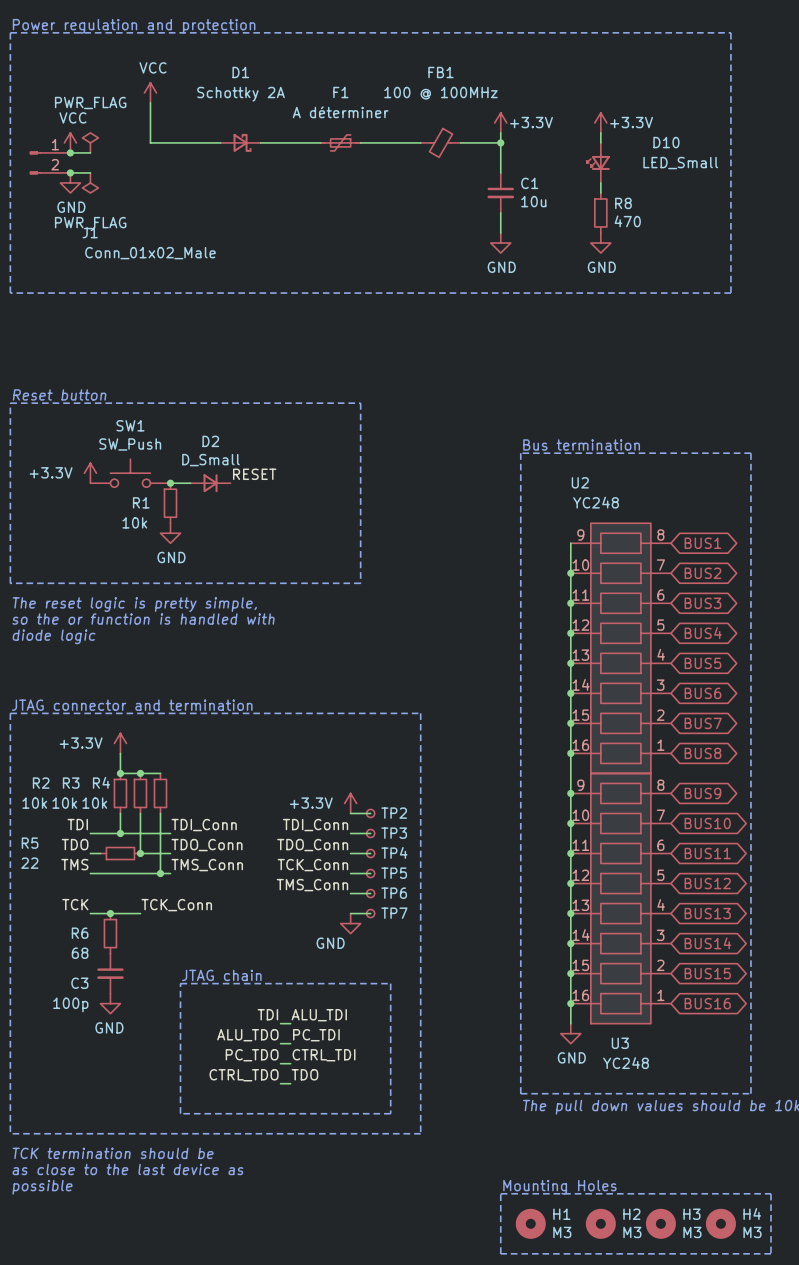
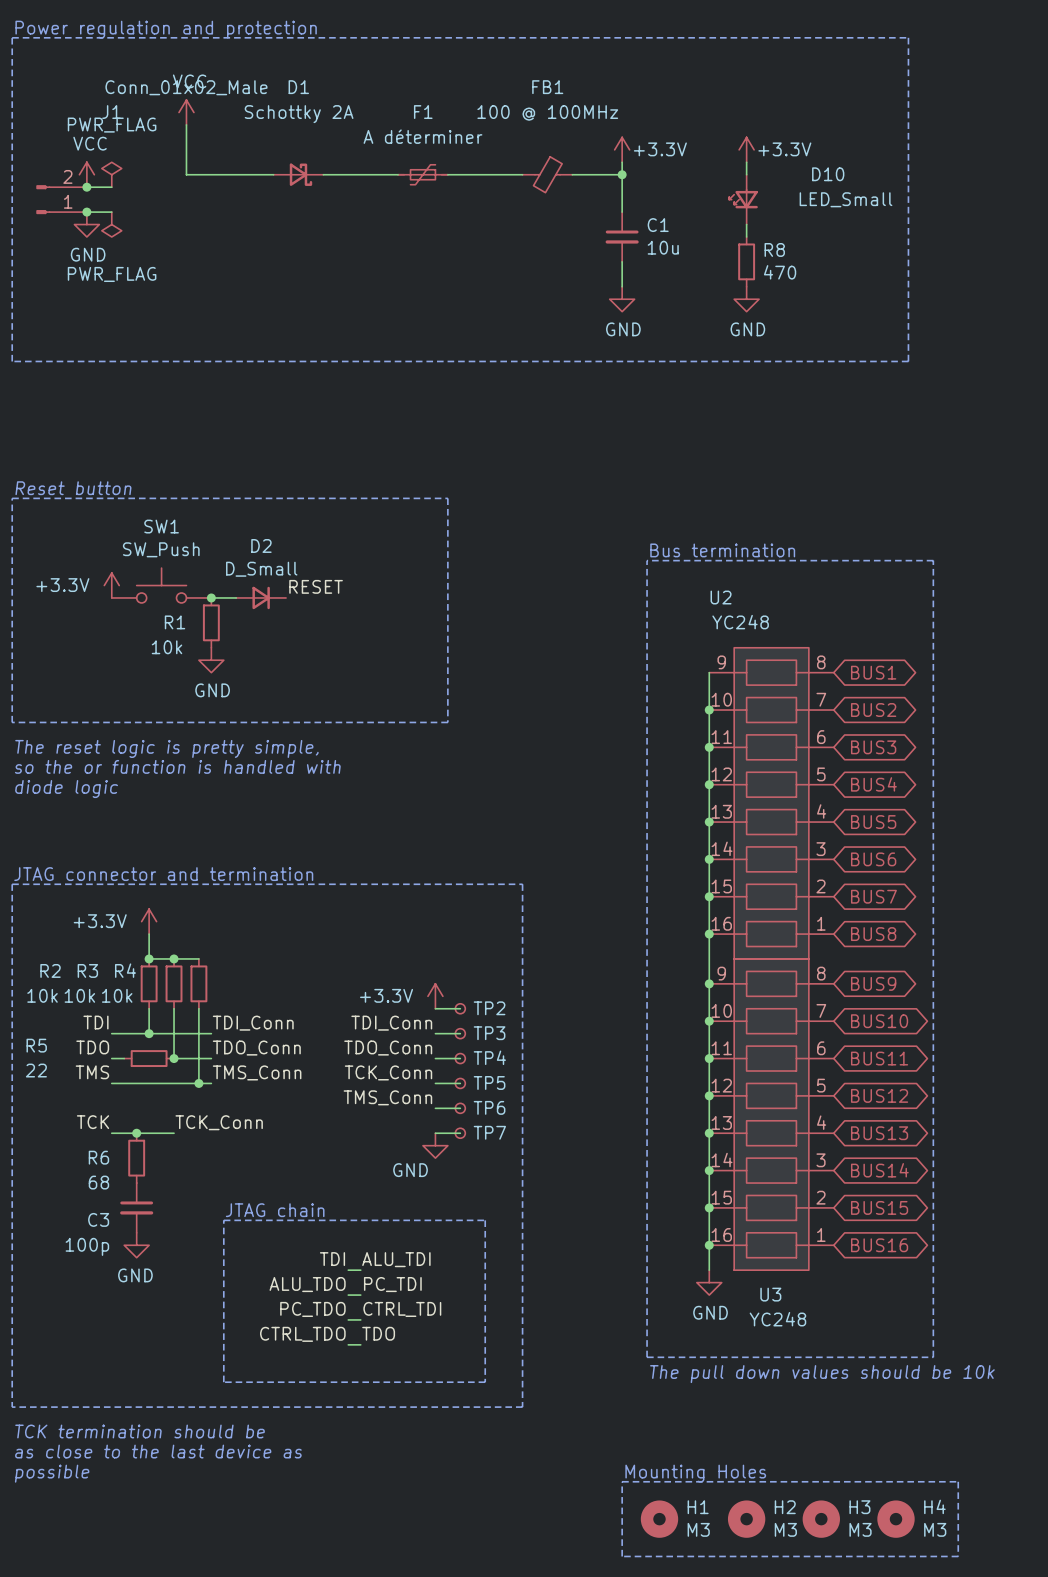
J1 flip: as is (35, 162) -> up-down (43, 199)

